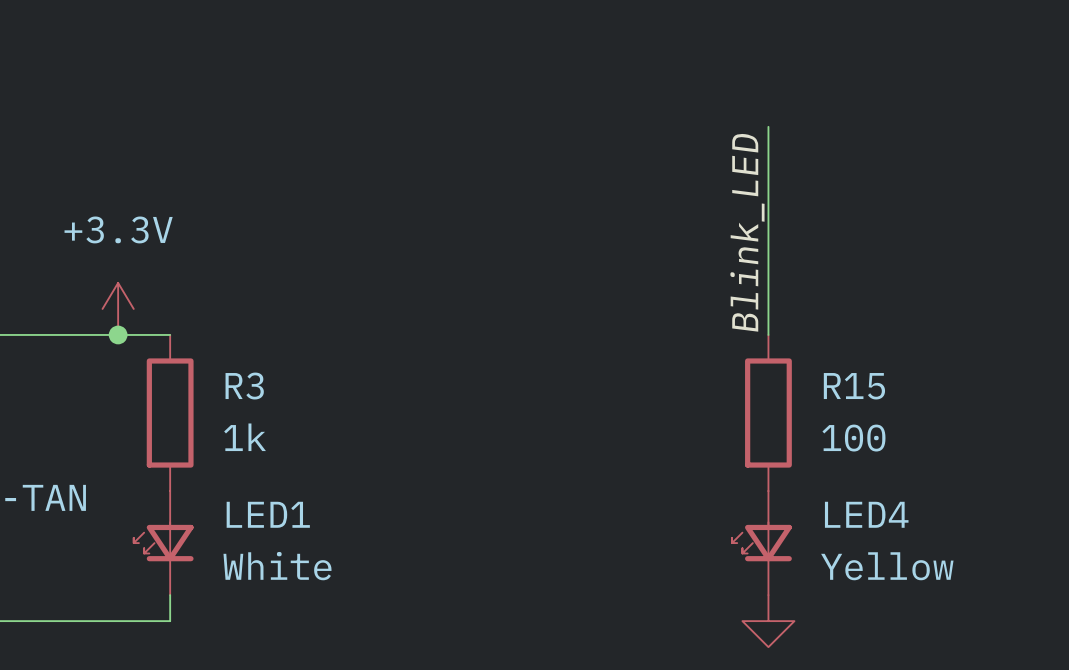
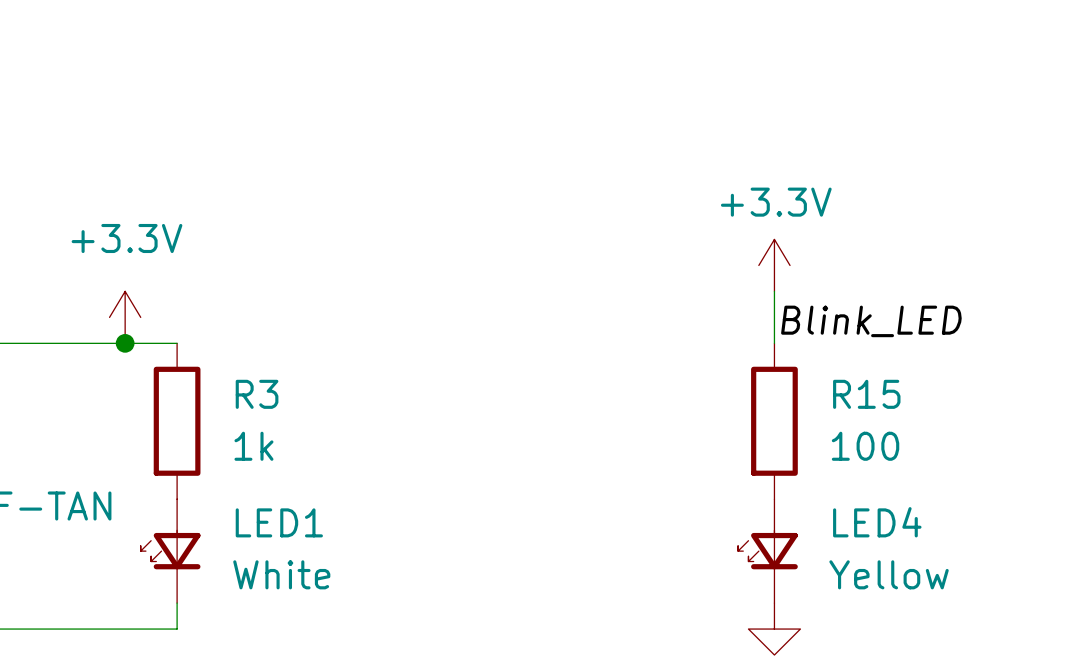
wire: (768, 126) (768, 282) -> none
label rotation: 0° (747, 232) -> 90° clockwise (871, 321)
power symbol: none -> +3.3V (774, 265)

